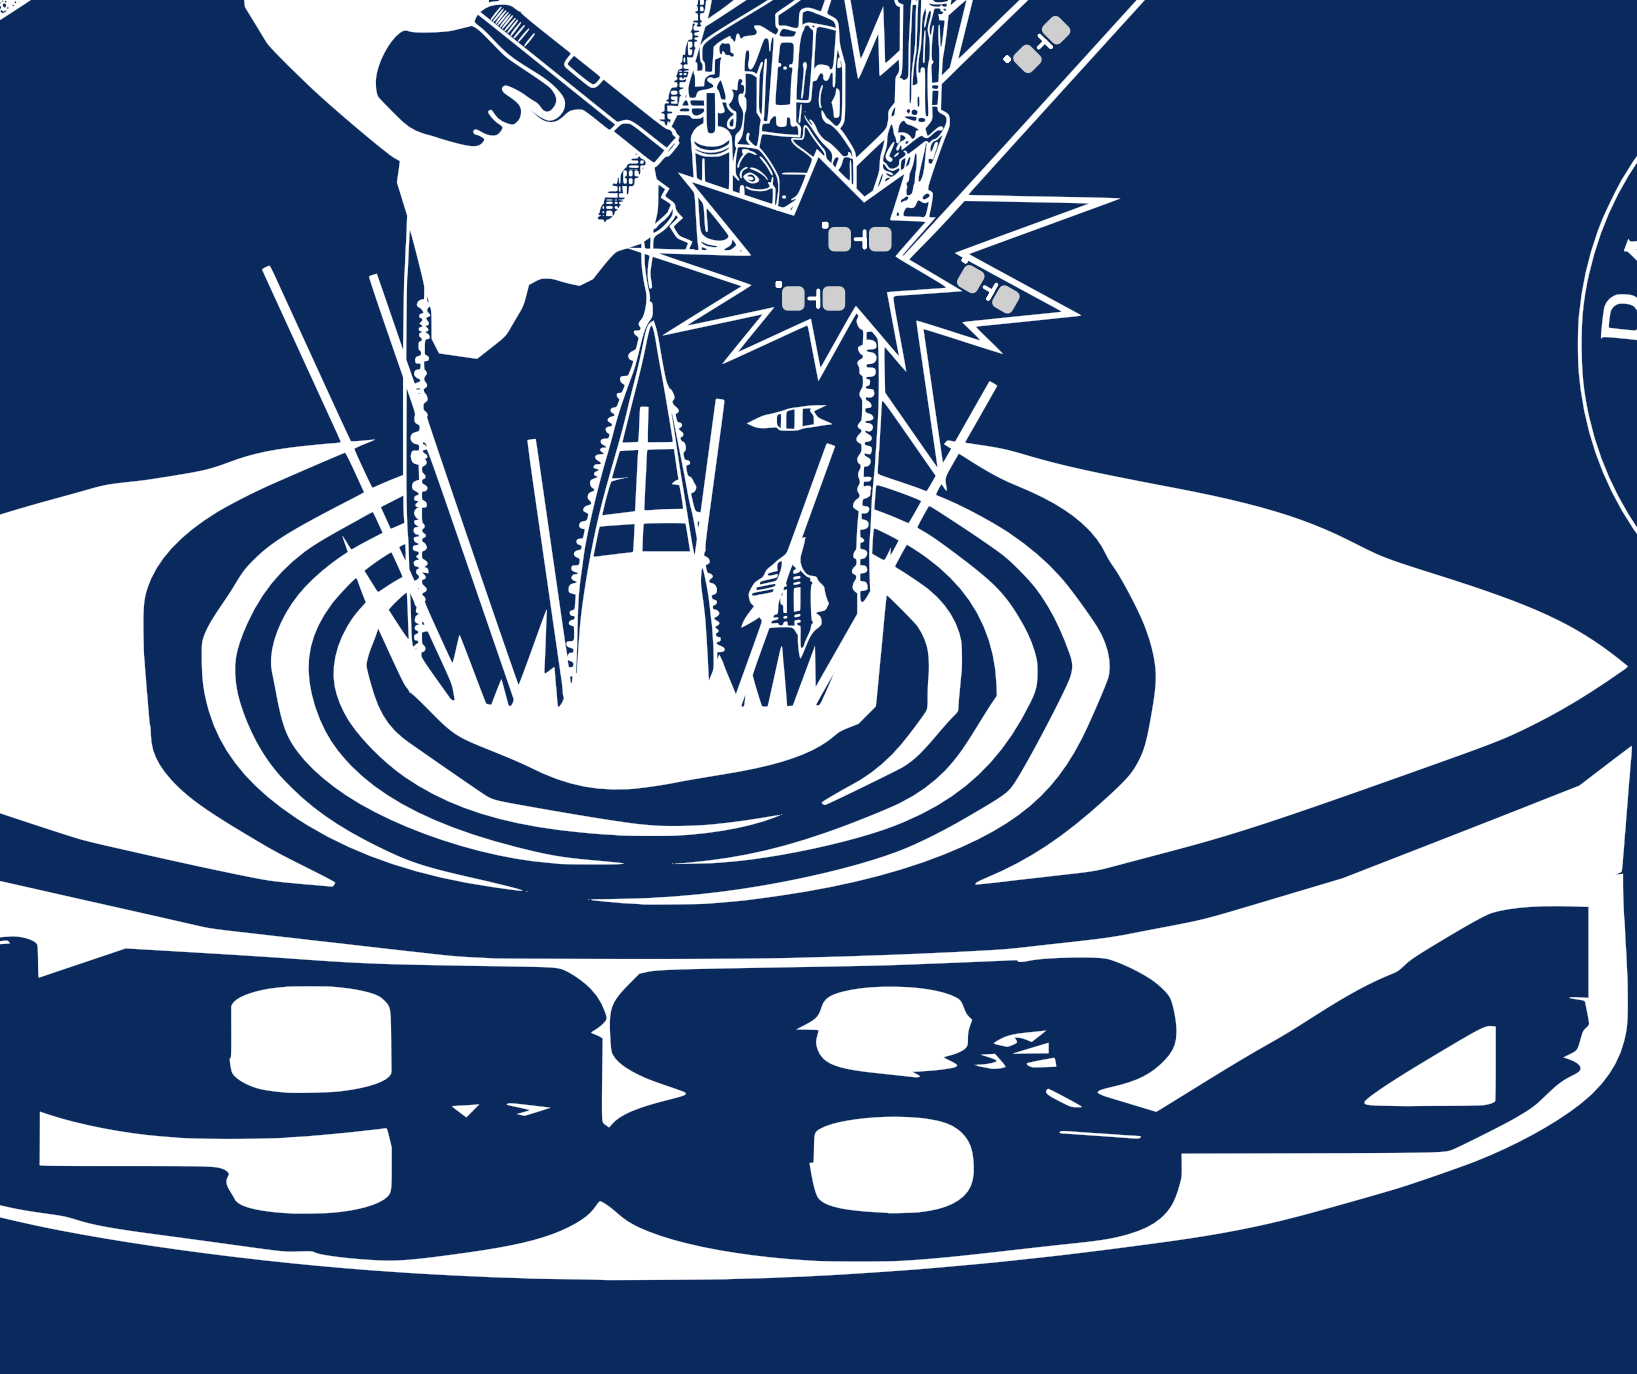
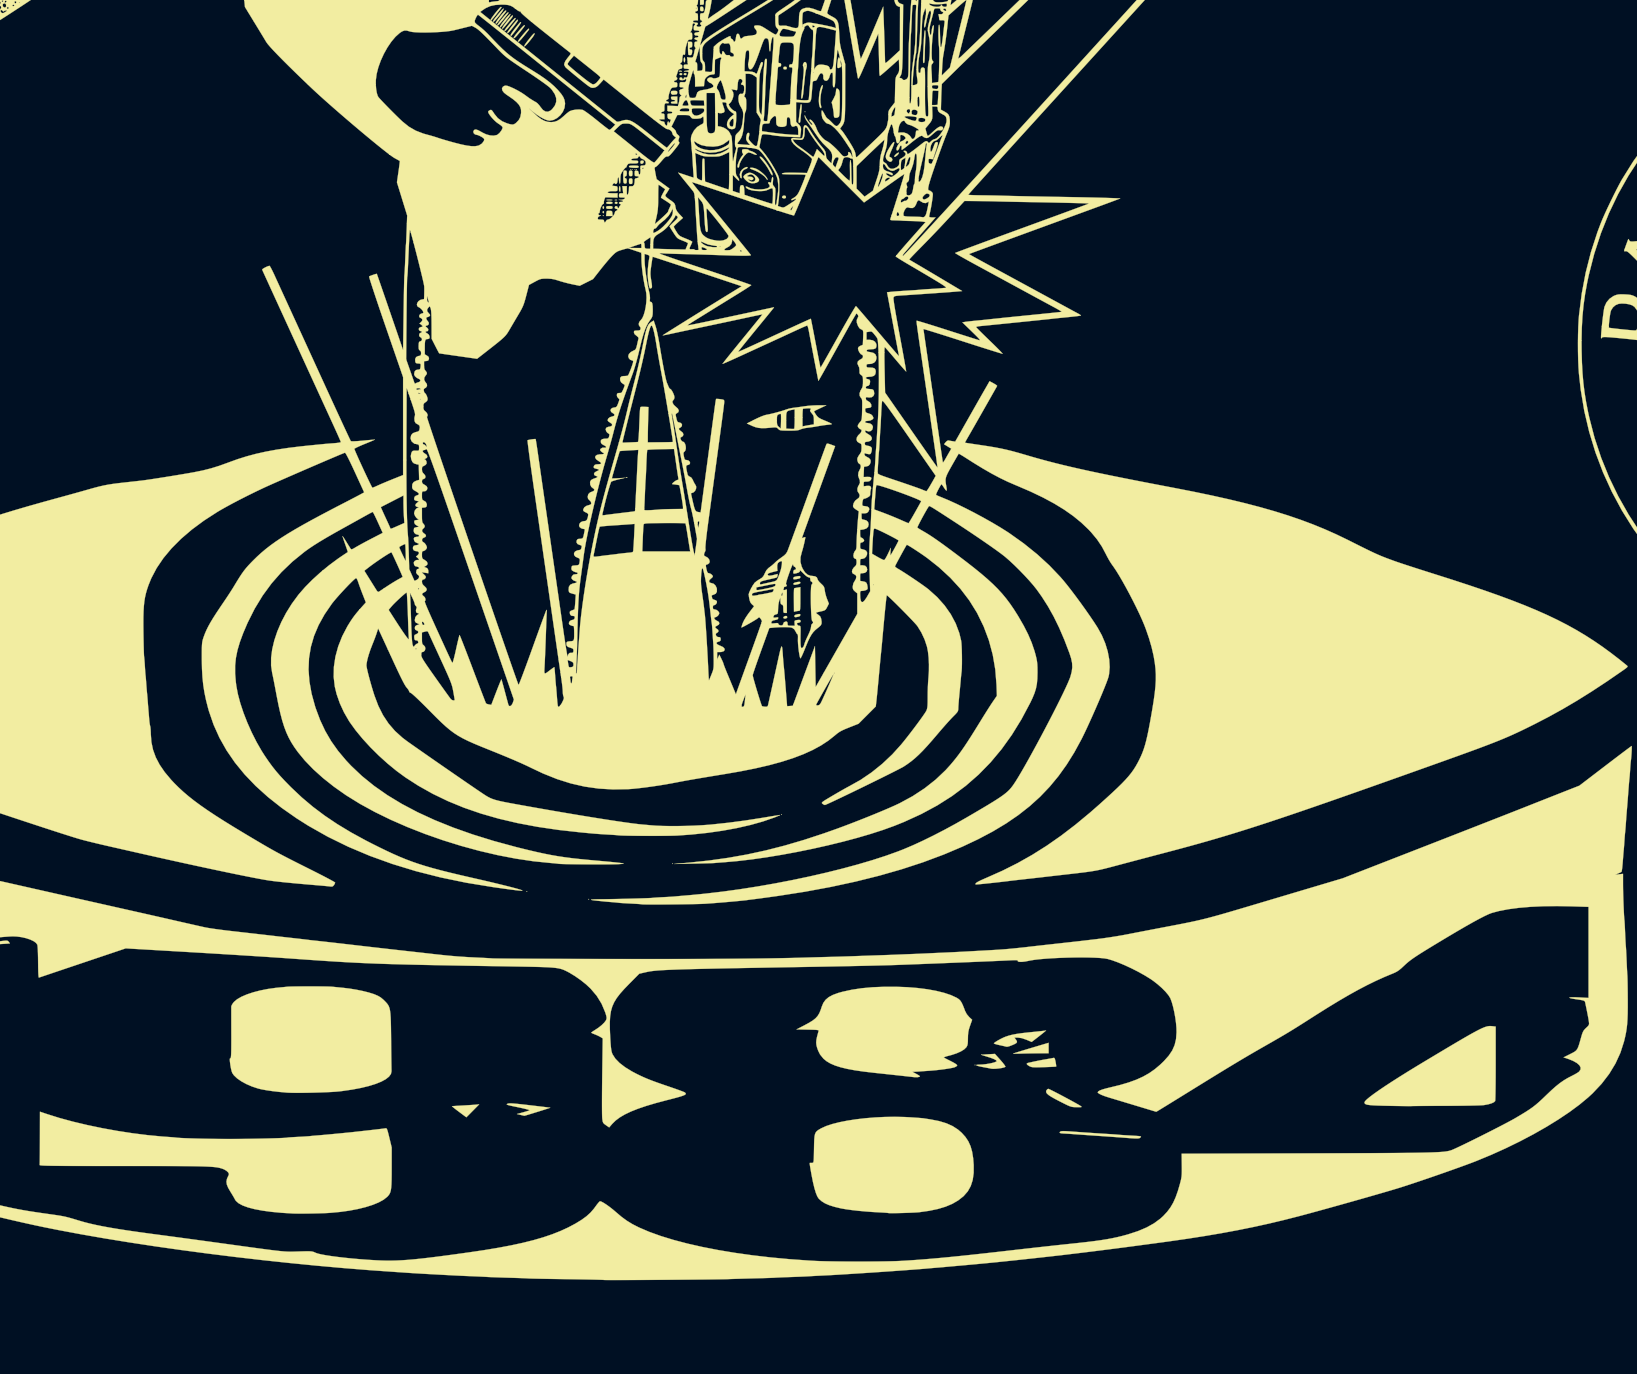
part: (1036, 44) -> none
part: (856, 236) -> none
part: (988, 284) -> none
part: (810, 295) -> none

